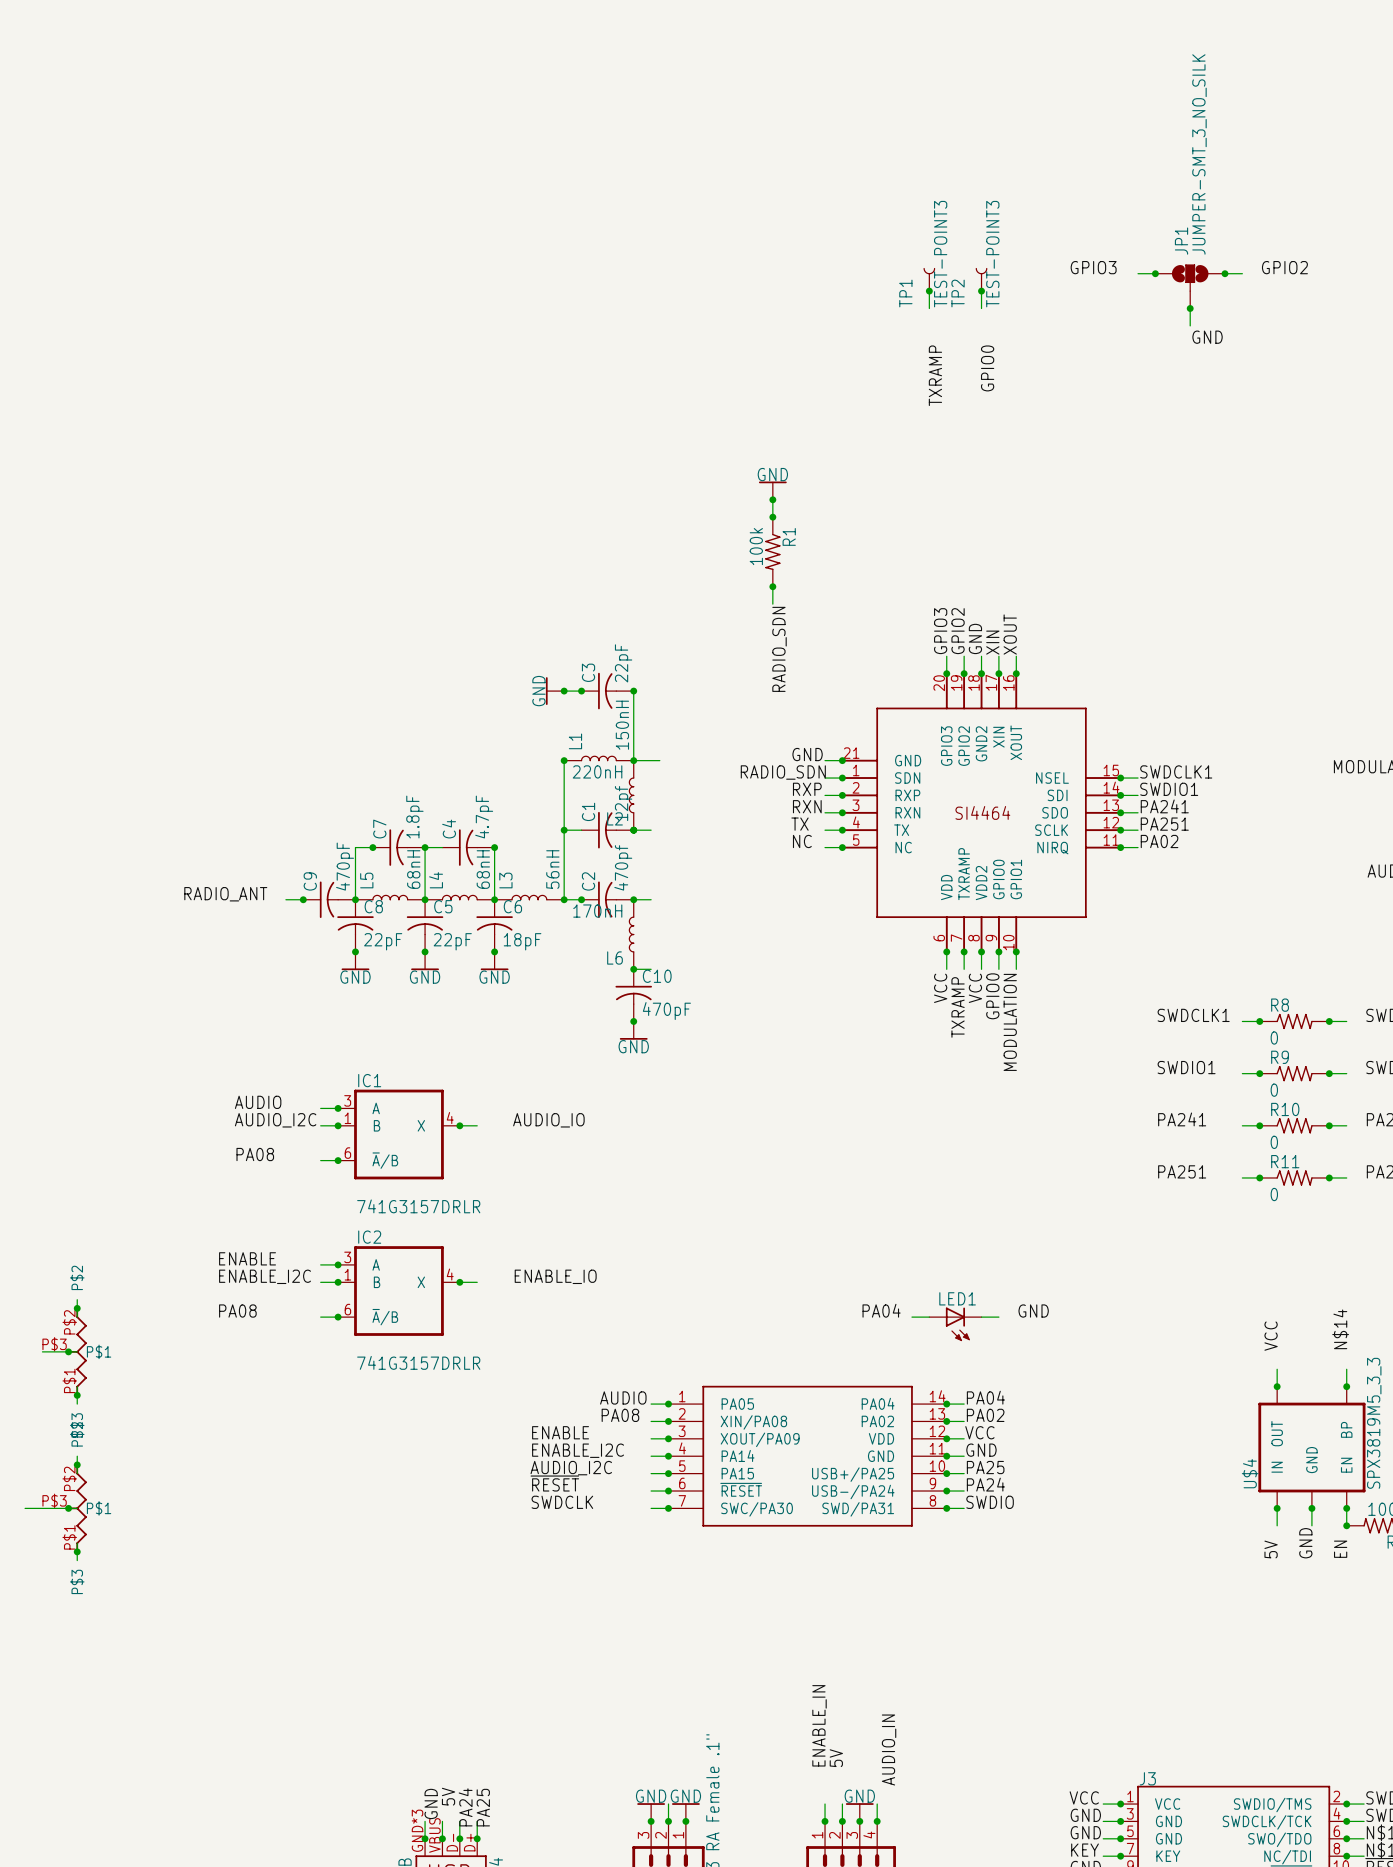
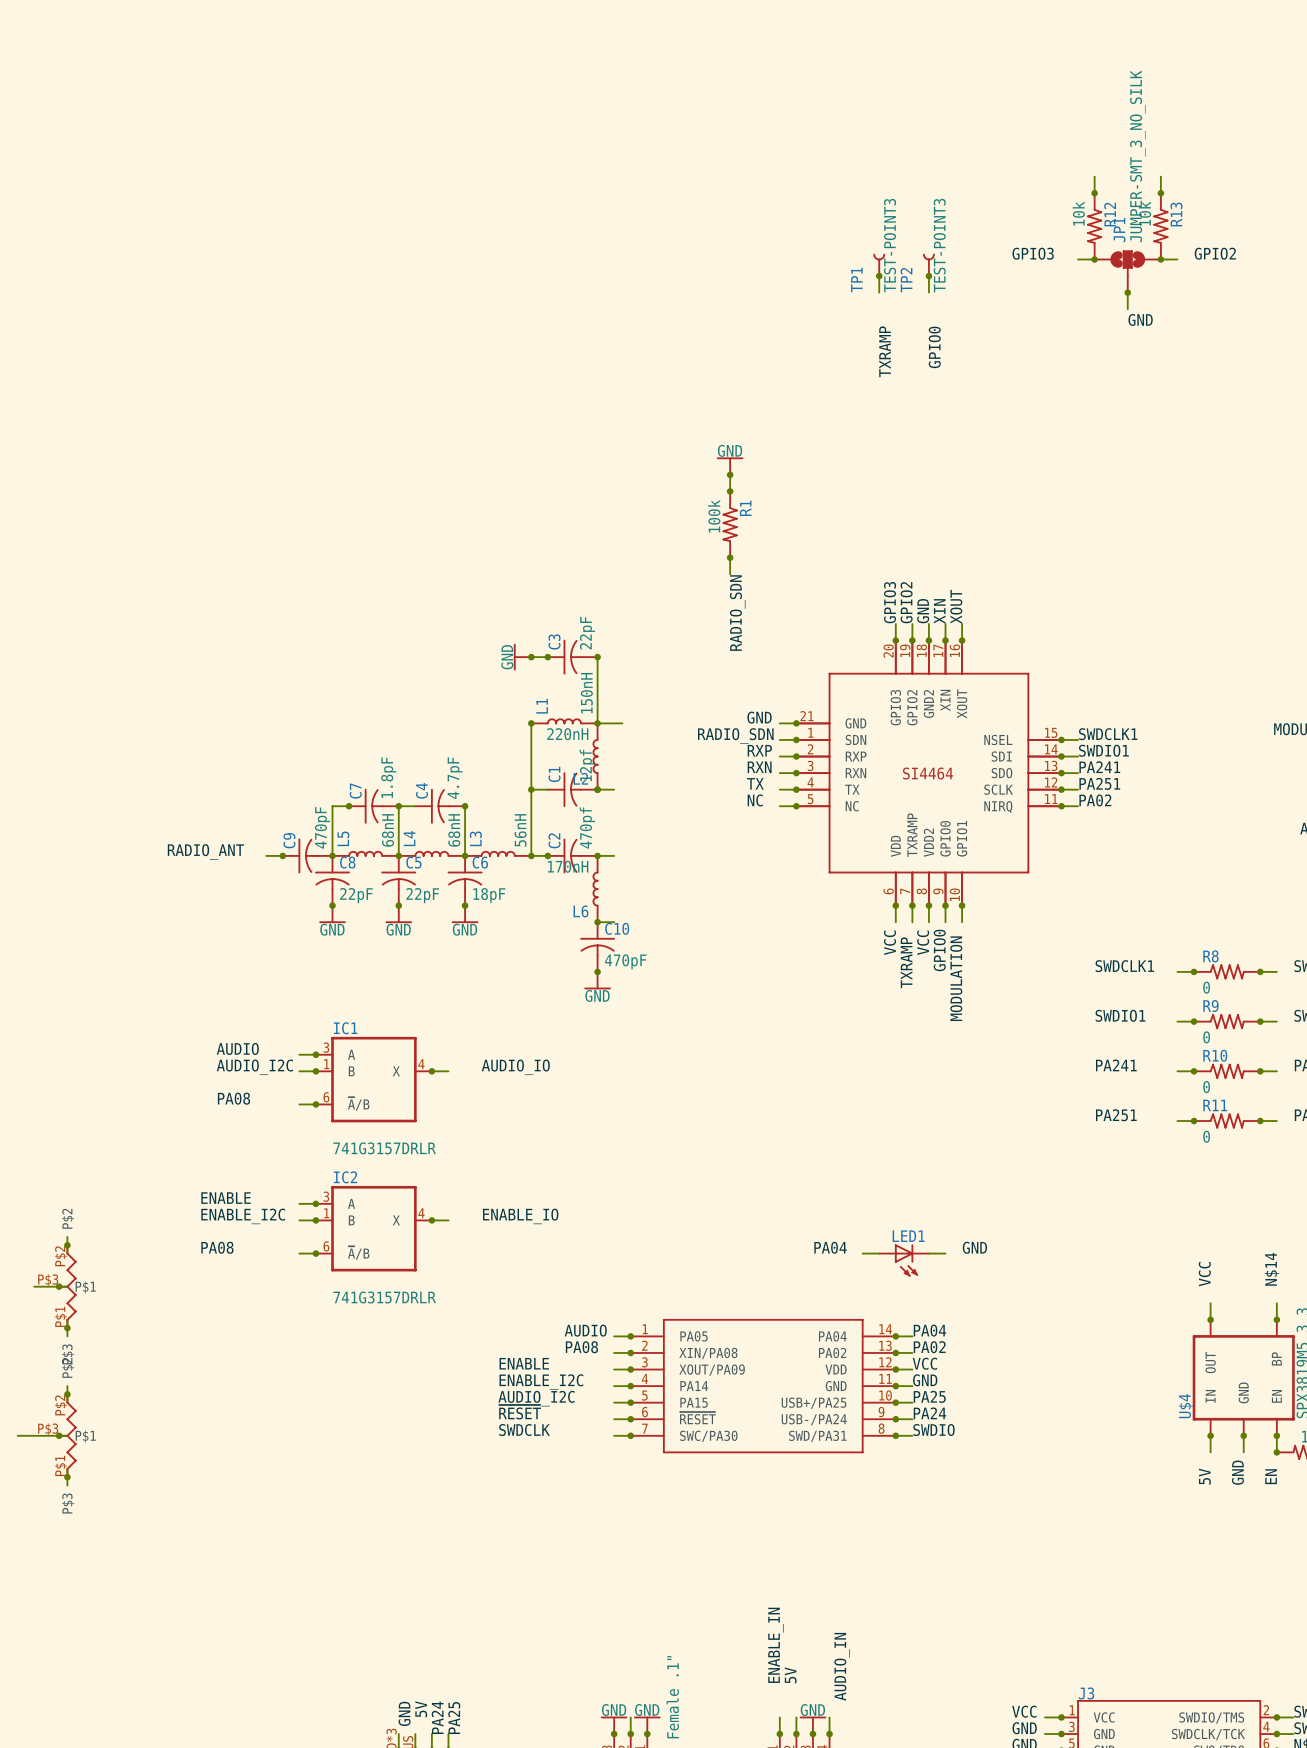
wire: none -> (1094, 176) (1094, 193)
wire: none -> (1160, 176) (1160, 193)
junction: none -> (1094, 193)
junction: none -> (1160, 193)
R12: none -> 10k (1094, 226)
R13: none -> 10k (1160, 226)

